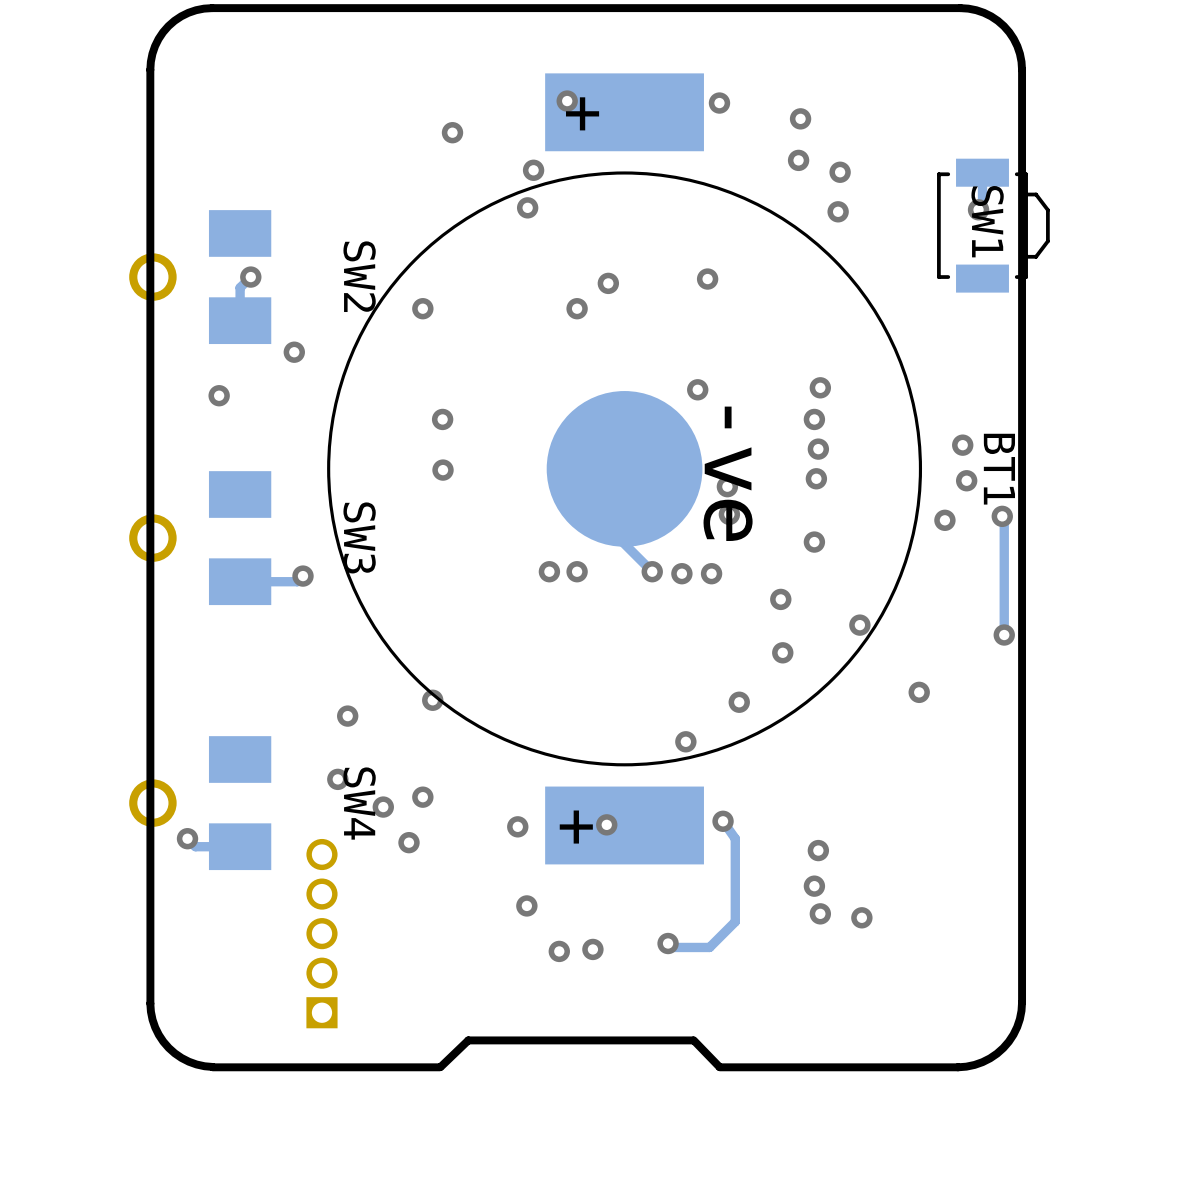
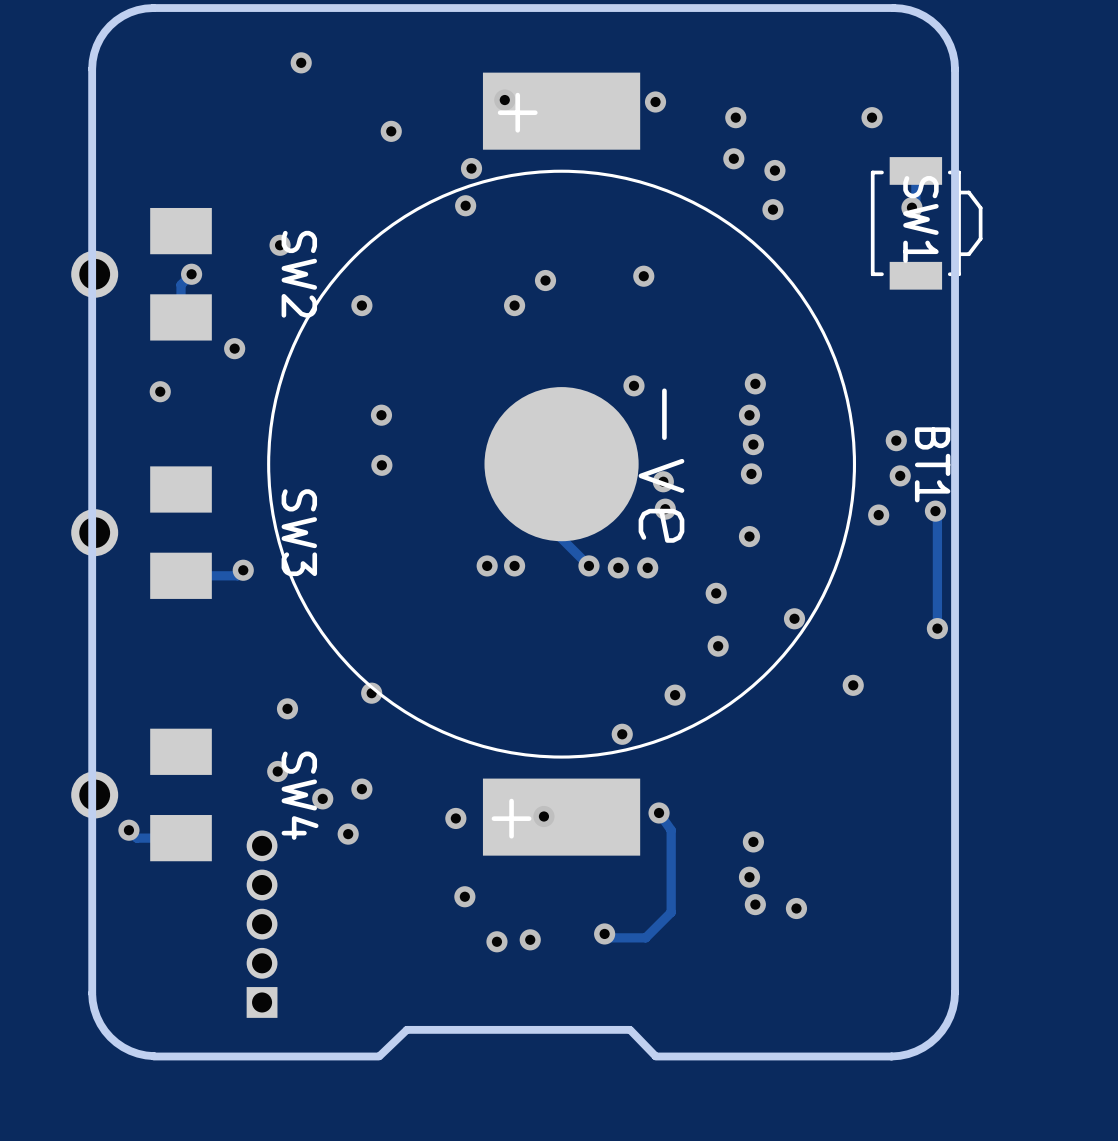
via: none -> (301, 62)
via: none -> (872, 117)
via: none -> (280, 245)

